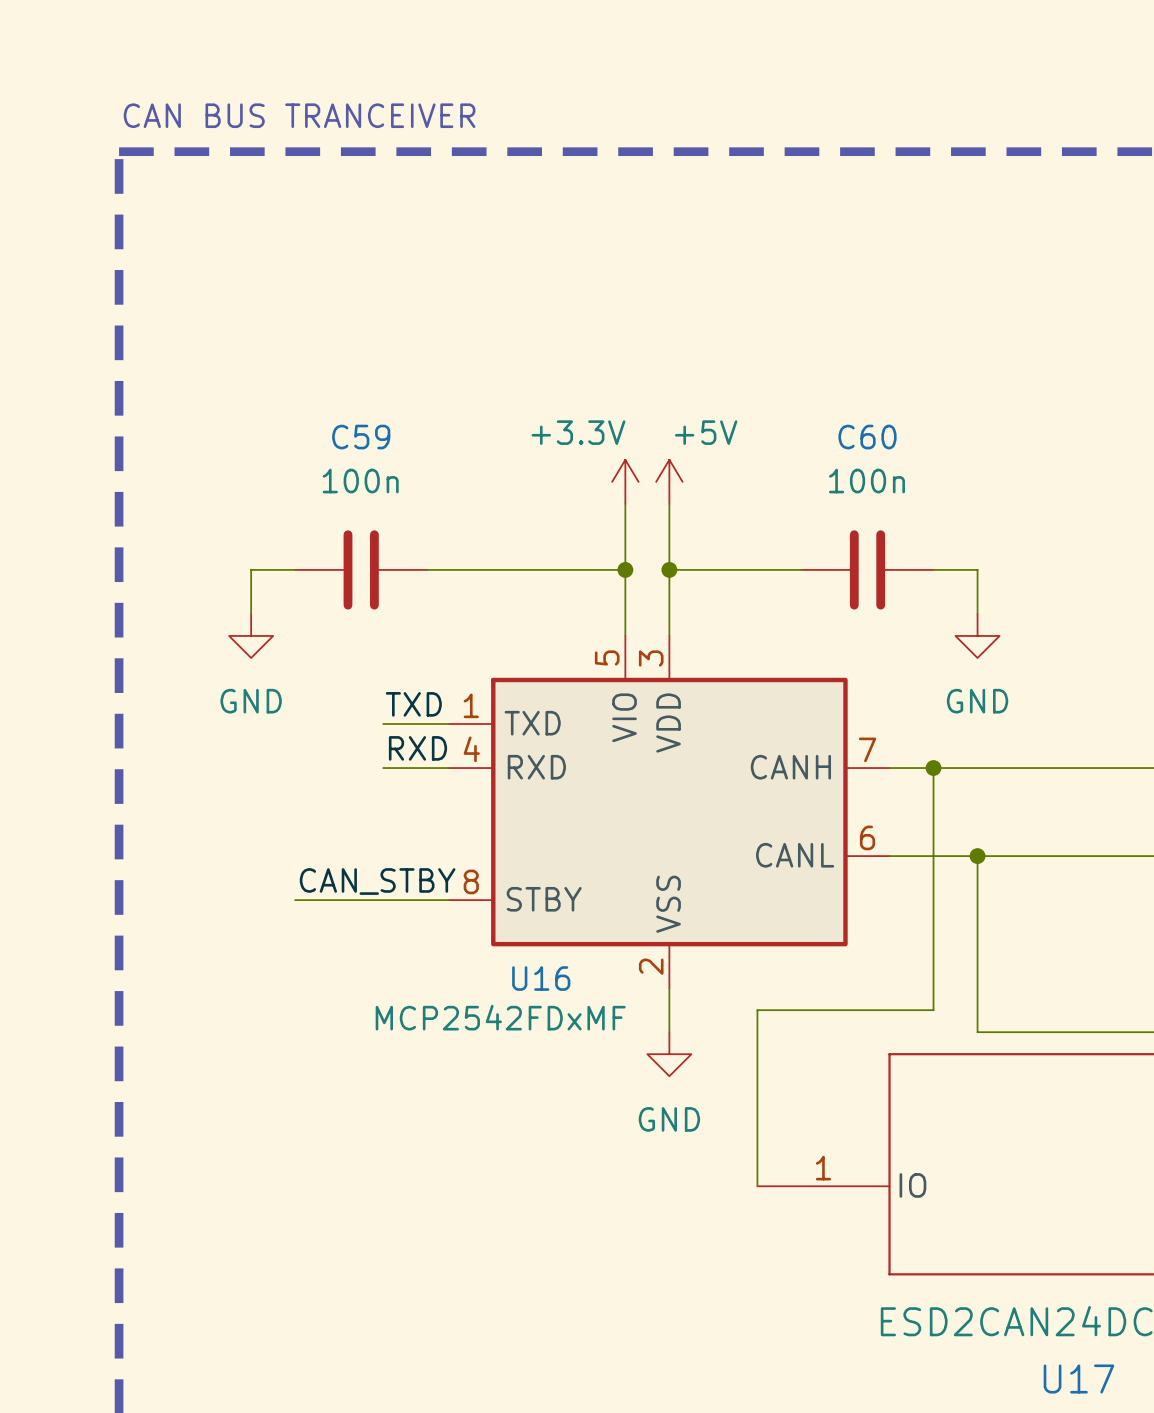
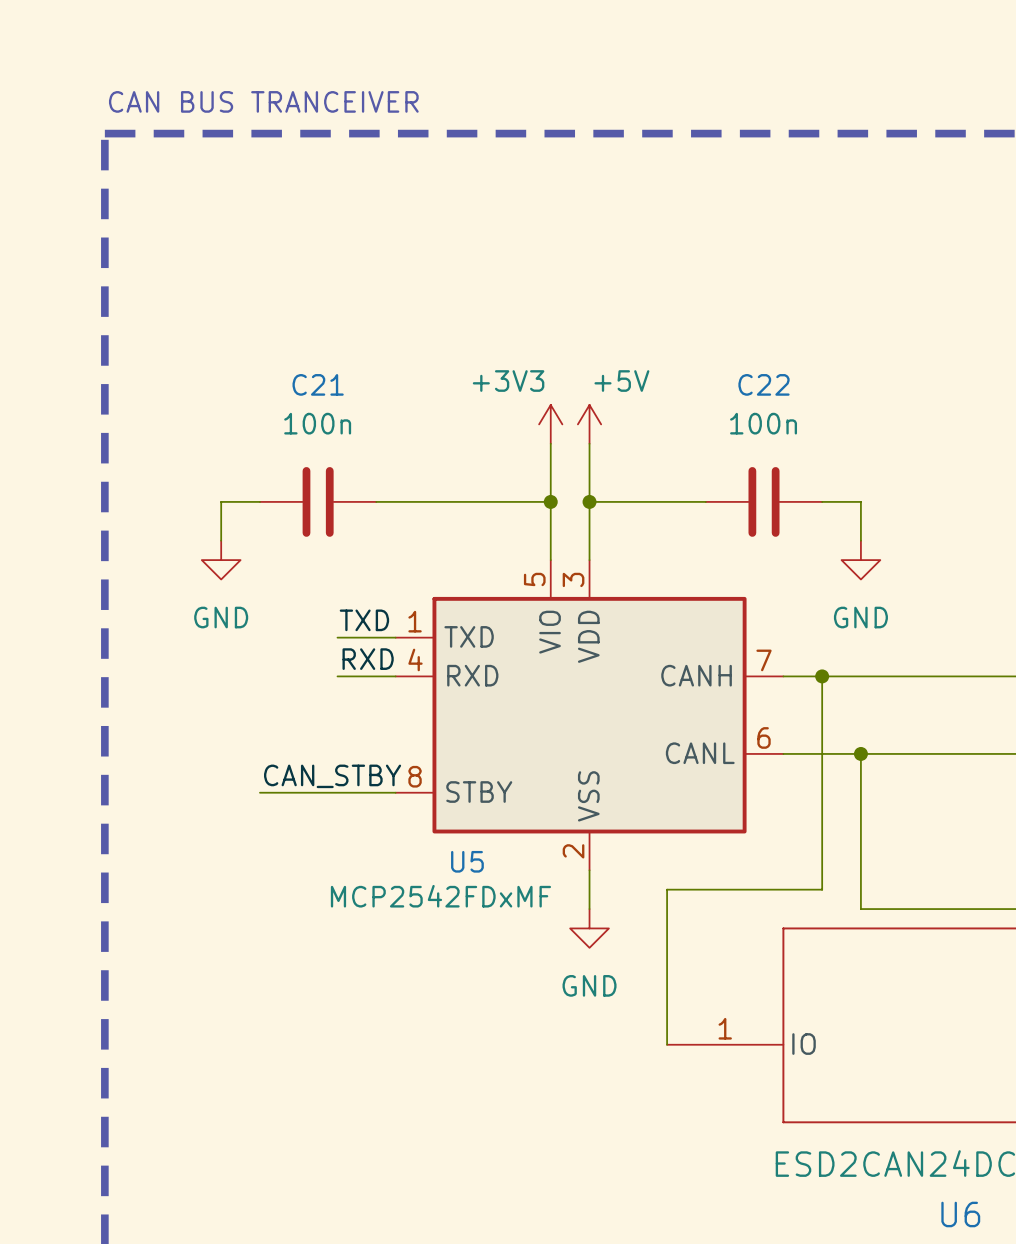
C59 name: C59 (361, 437) -> C21 (318, 384)
C60 name: C60 (867, 437) -> C22 (764, 384)
power symbol: +3.3V (625, 481) -> +3V3 (550, 424)
U16 name: U16 (541, 978) -> U5 (467, 861)
U17 name: U17 (1078, 1378) -> U6 (960, 1214)

